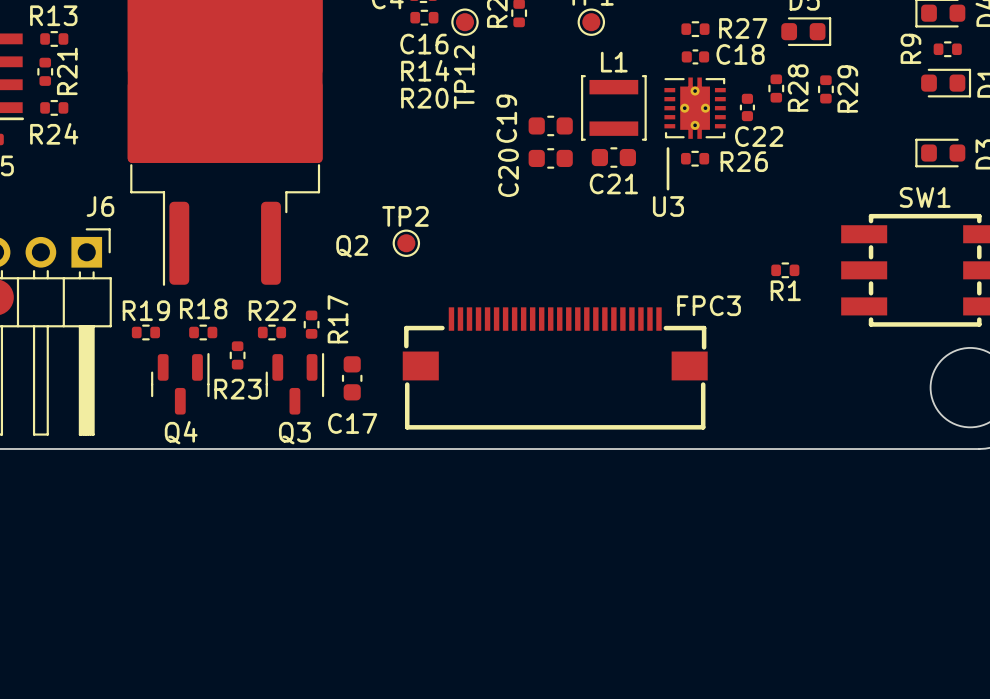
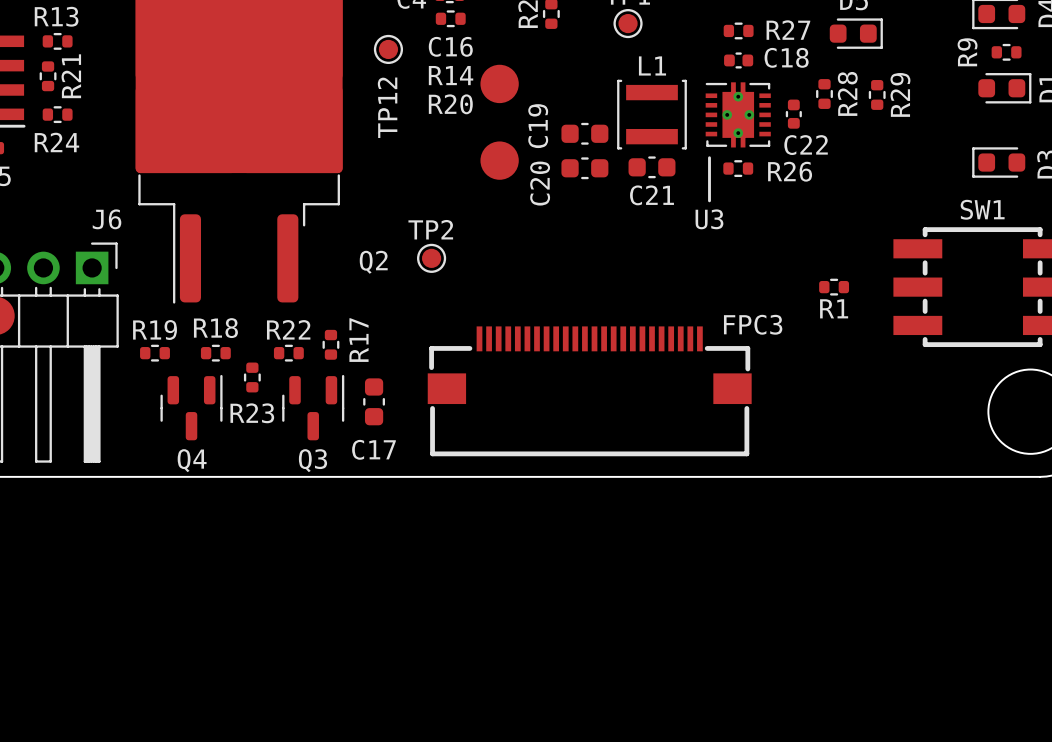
TP12 position: (464, 22) -> (388, 49)
part: none -> (499, 122)

